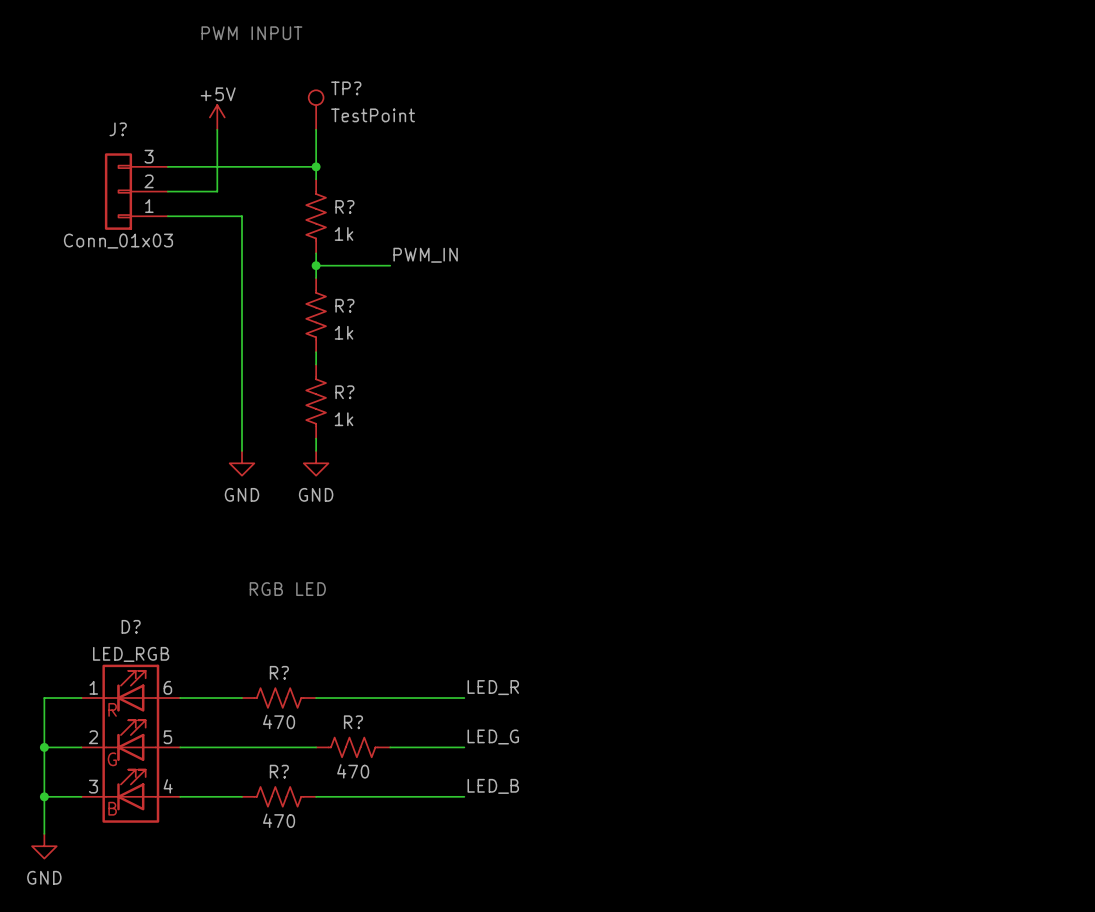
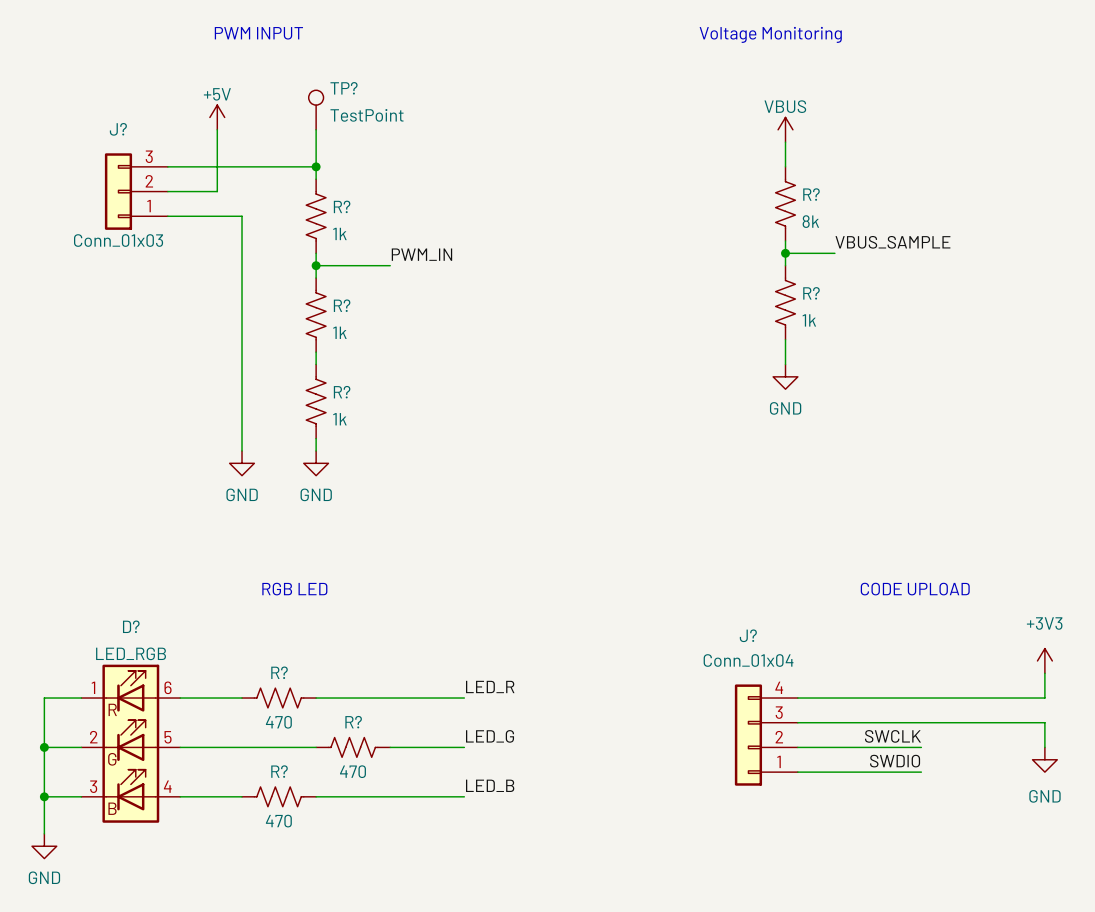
text: none -> Voltage Monitoring (770, 34)
power symbol: none -> VBUS (785, 129)
wire: none -> (785, 142) (785, 166)
R?: none -> 8k (785, 203)
wire: none -> (785, 240) (785, 265)
label: none -> VBUS_SAMPLE (892, 242)
wire: none -> (785, 253) (834, 253)
junction: none -> (785, 253)
R?: none -> 1k (785, 302)
wire: none -> (785, 339) (785, 364)
power symbol: none -> GND (785, 376)
text: none -> CODE UPLOAD (915, 589)
power symbol: none -> +3V3 (1044, 660)
wire: none -> (1044, 673) (1044, 698) (797, 698)
wire: none -> (797, 722) (1044, 722) (1044, 747)
J?: none -> Conn_01x04 (766, 735)
label: none -> SWCLK (892, 736)
wire: none -> (797, 747) (921, 747)
power symbol: none -> GND (1044, 759)
label: none -> SWDIO (895, 761)
wire: none -> (797, 772) (921, 772)

